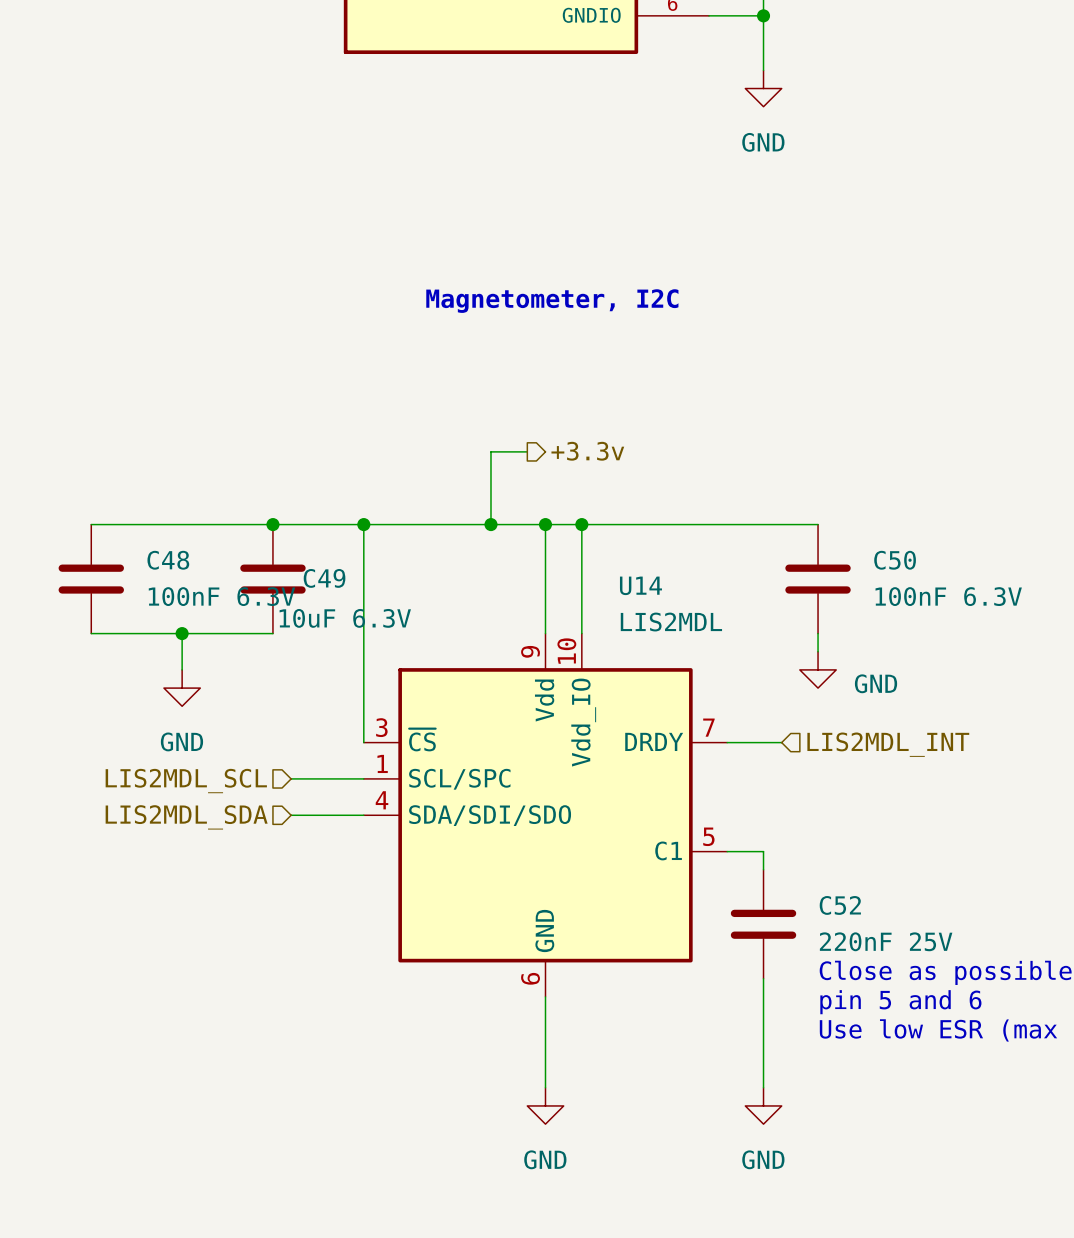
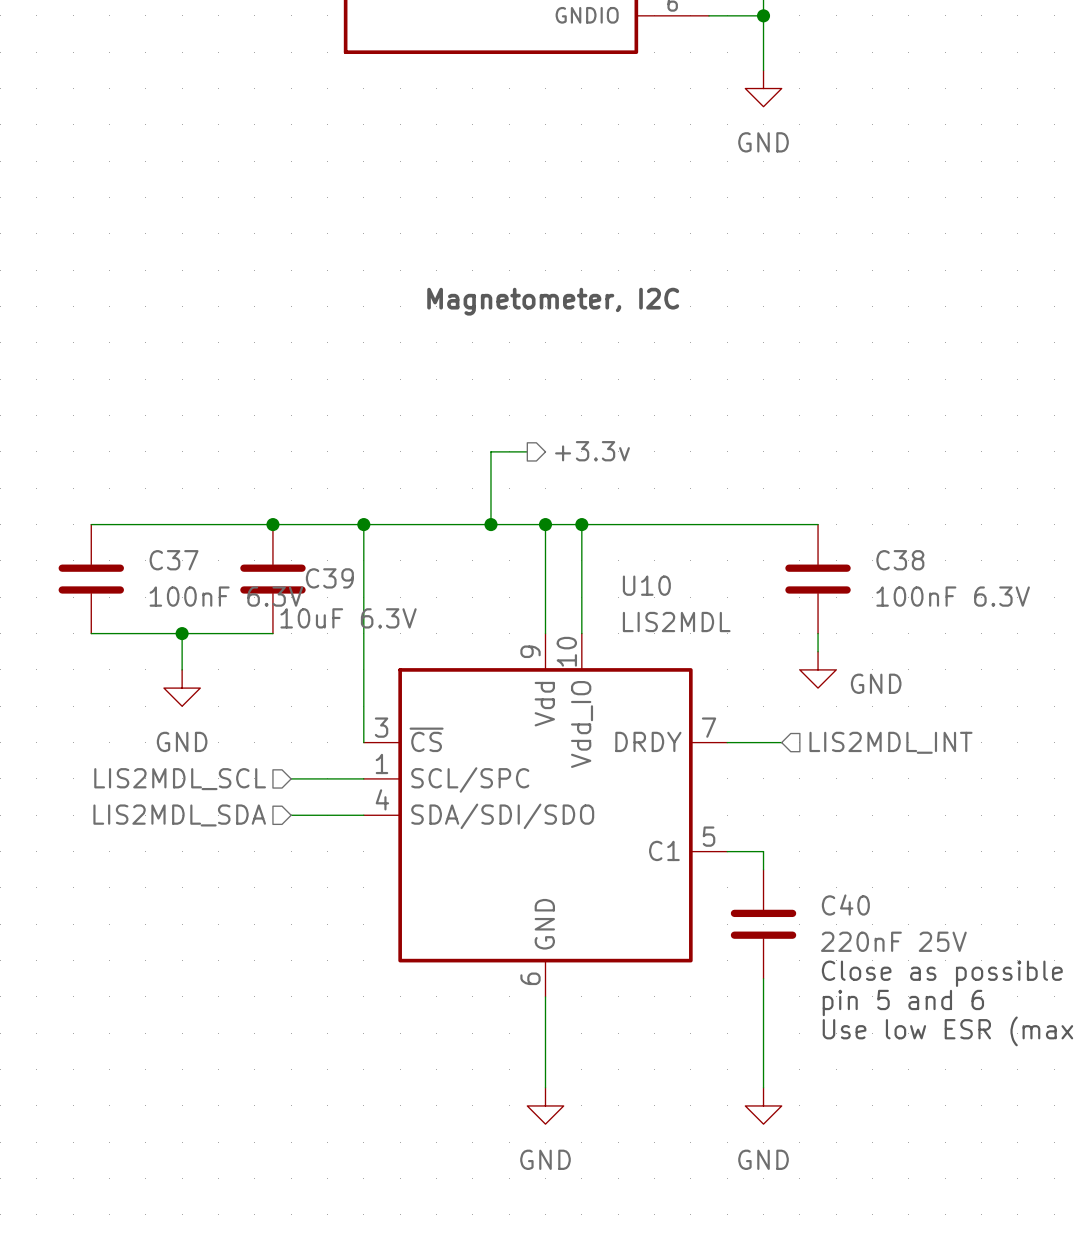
C48 name: C48 (168, 560) -> C37 (174, 560)
C50 name: C50 (895, 560) -> C38 (900, 560)
C49 name: C49 (324, 578) -> C39 (329, 578)
U14 name: U14 (640, 585) -> U10 (646, 585)
C52 name: C52 (840, 905) -> C40 (845, 905)

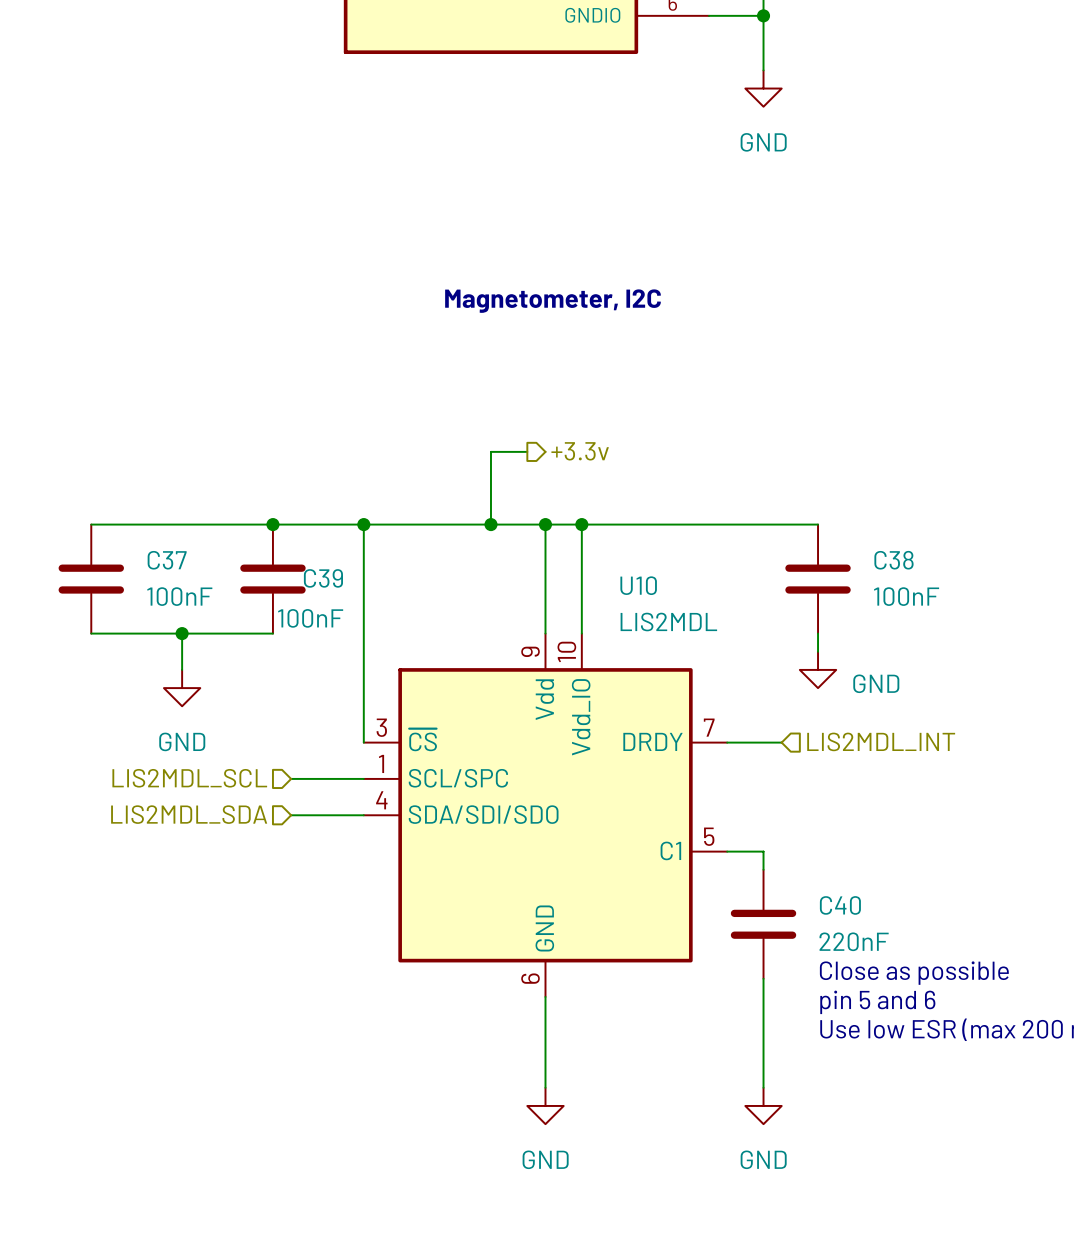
C37 value: 100nF 6.3V (226, 596) -> 100nF (179, 596)
C38 value: 100nF 6.3V (953, 596) -> 100nF (906, 596)
C39 value: 10uF 6.3V (348, 618) -> 100nF (310, 618)
C40 value: 220nF 25V (893, 941) -> 220nF (854, 941)

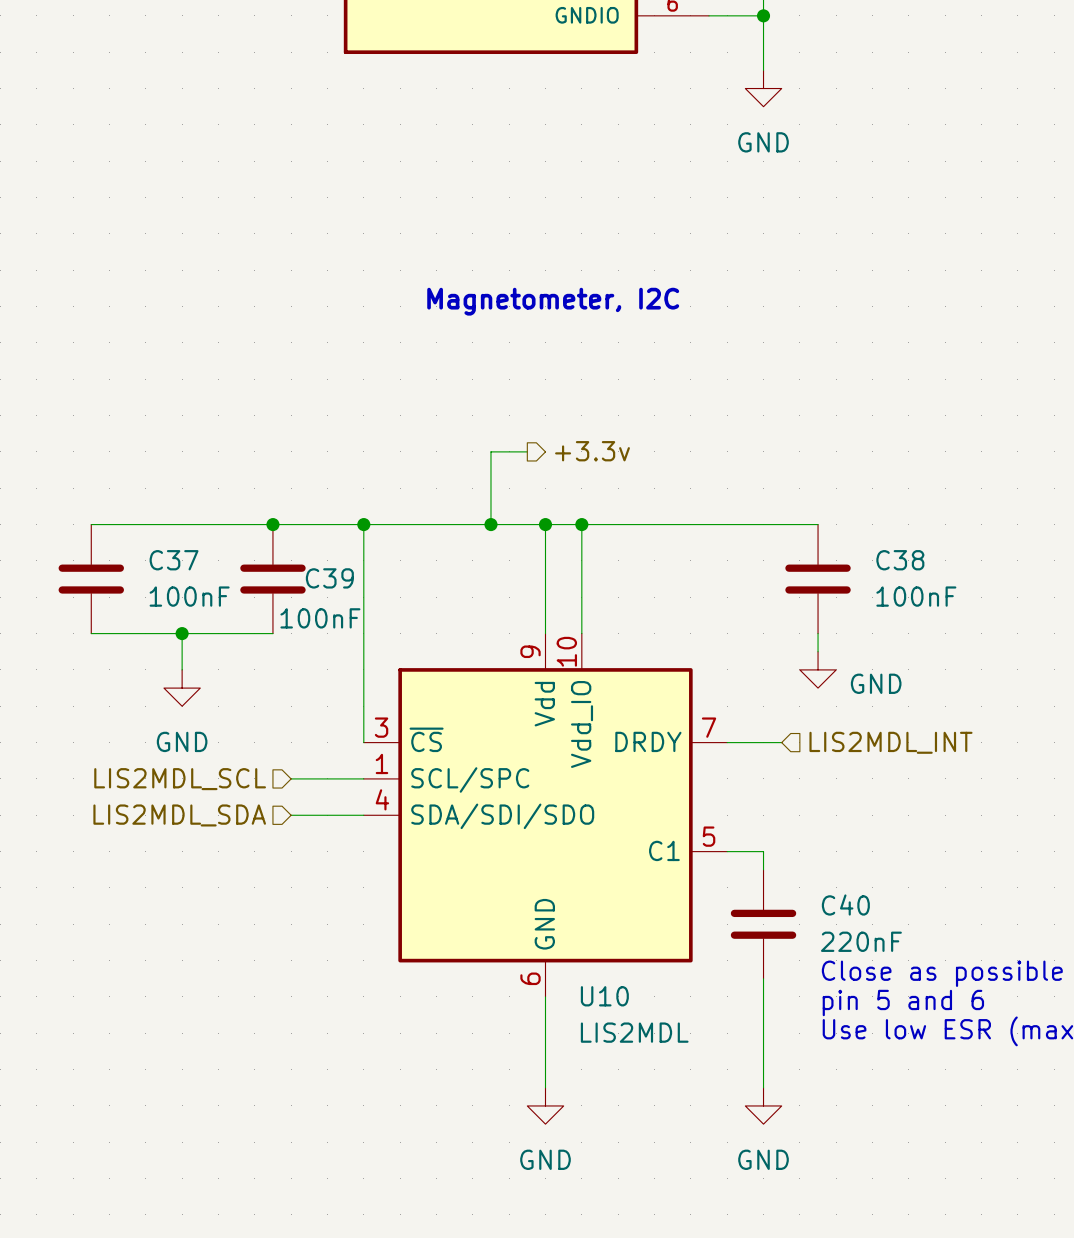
U10 name position: U10 (638, 585) -> U10 (604, 996)
U10 value position: LIS2MDL (668, 622) -> LIS2MDL (634, 1032)

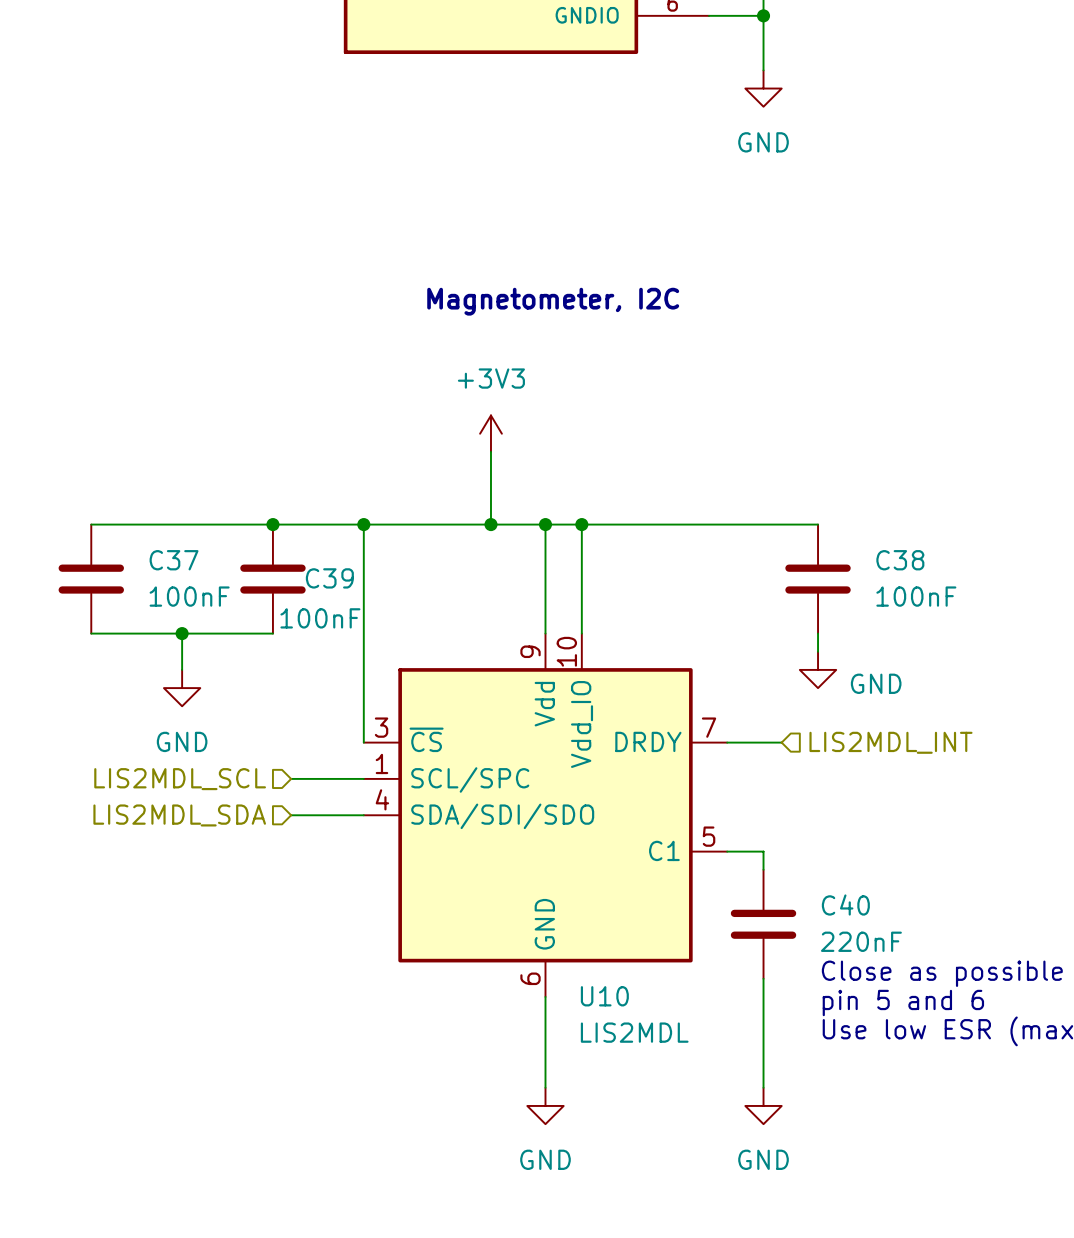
power symbol: none -> +3V3 (490, 433)
wire: (490, 451) (527, 451) -> none
hierarchical label: +3.3v (592, 451) -> none

